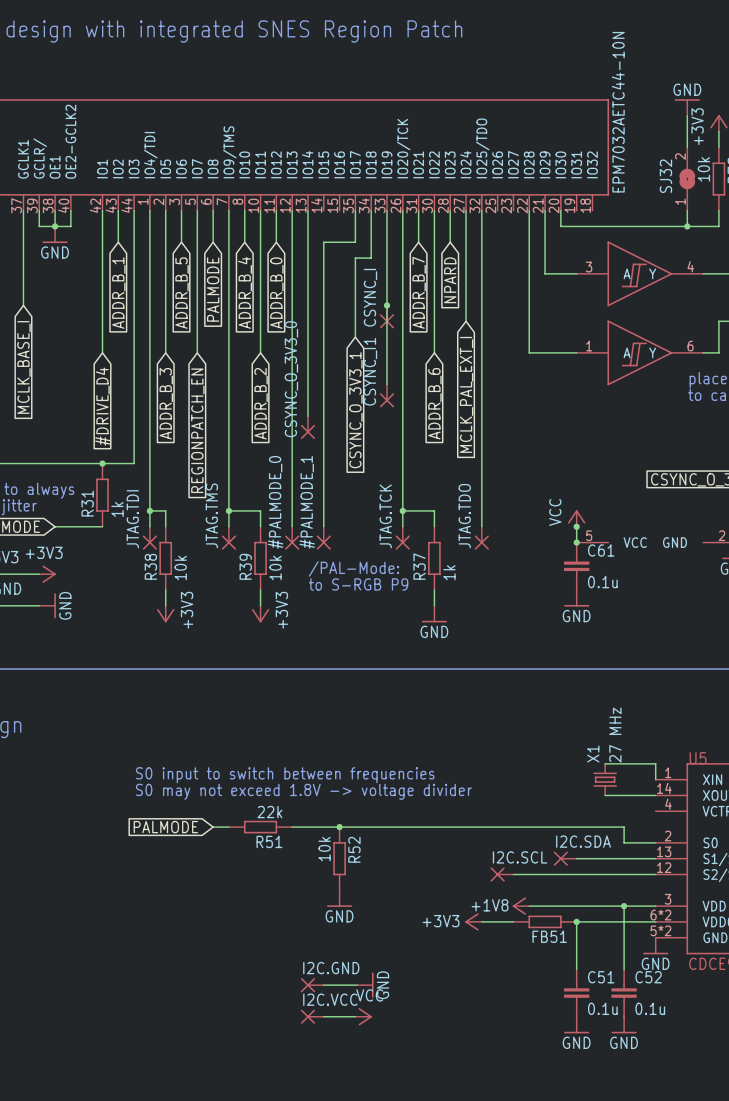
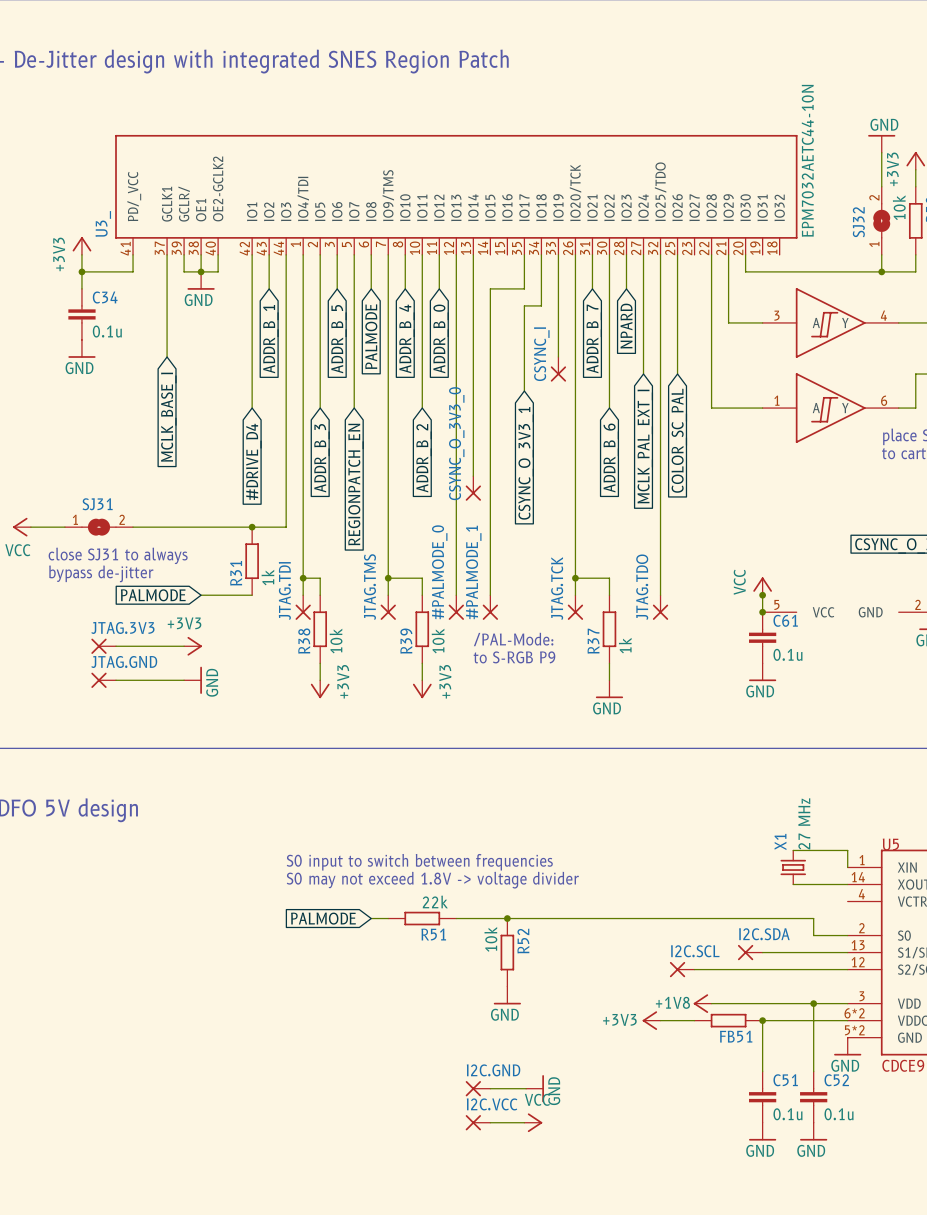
wire: none -> (677, 254) (677, 374)
wire: (387, 305) (387, 384) -> none
junction: (387, 305) -> none
global label: none -> COLOR_SC_PAL (679, 440)
CSYNC_I1: (387, 395) -> none

